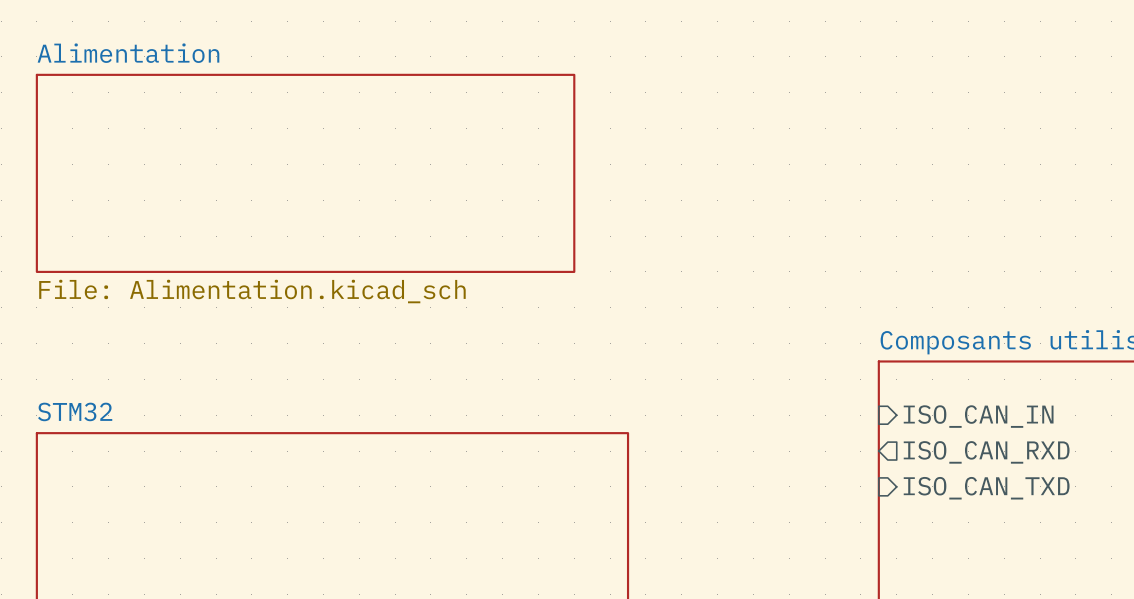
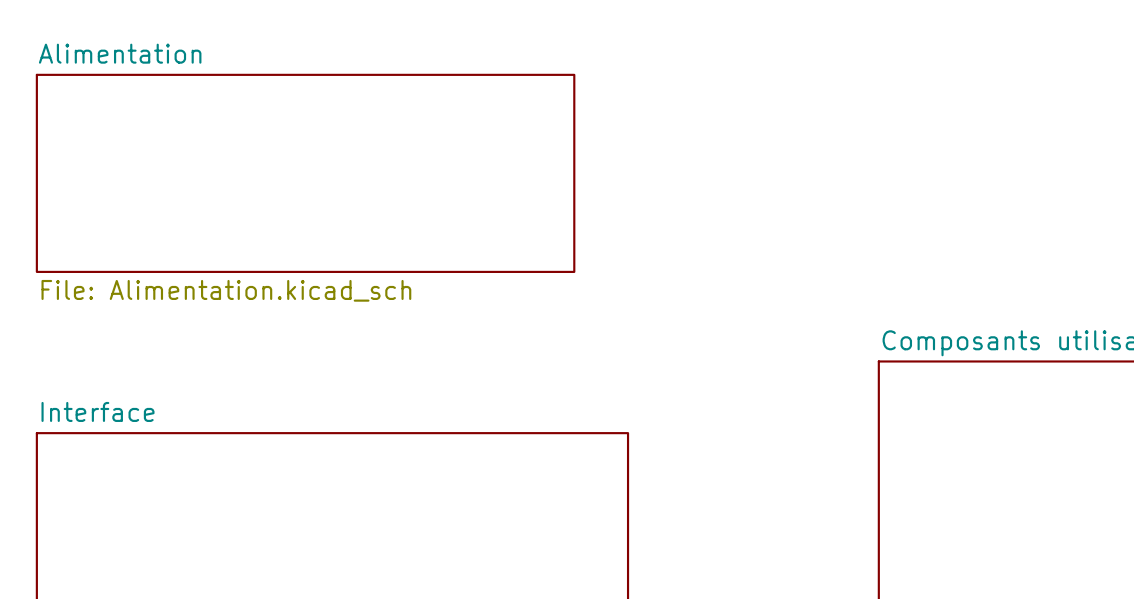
sheet STM32 name: STM32 (75, 411) -> Interface (98, 411)
sheet pin: ISO_CAN_IN (978, 416) -> none
sheet pin: ISO_CAN_RXD (986, 452) -> none
sheet pin: ISO_CAN_TXD (986, 488) -> none

